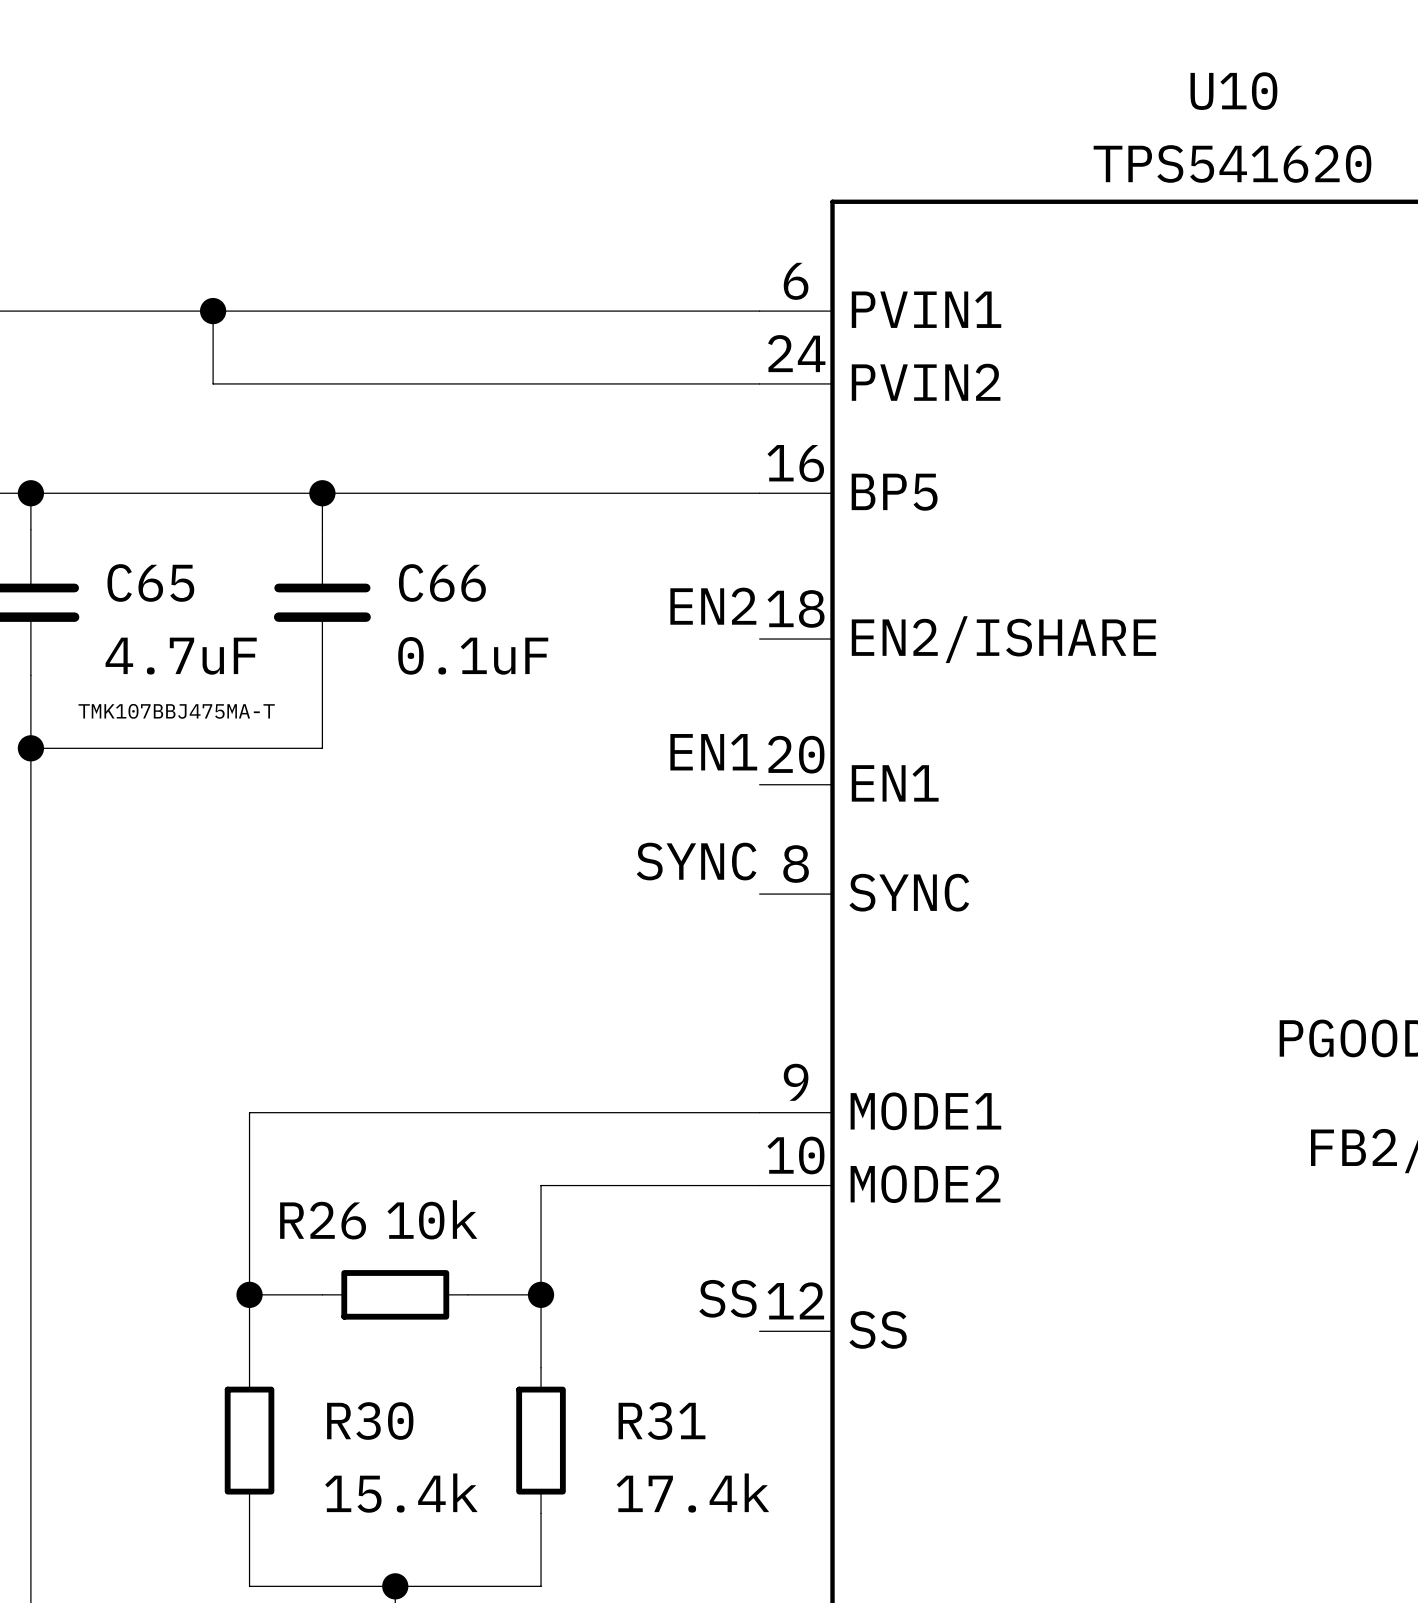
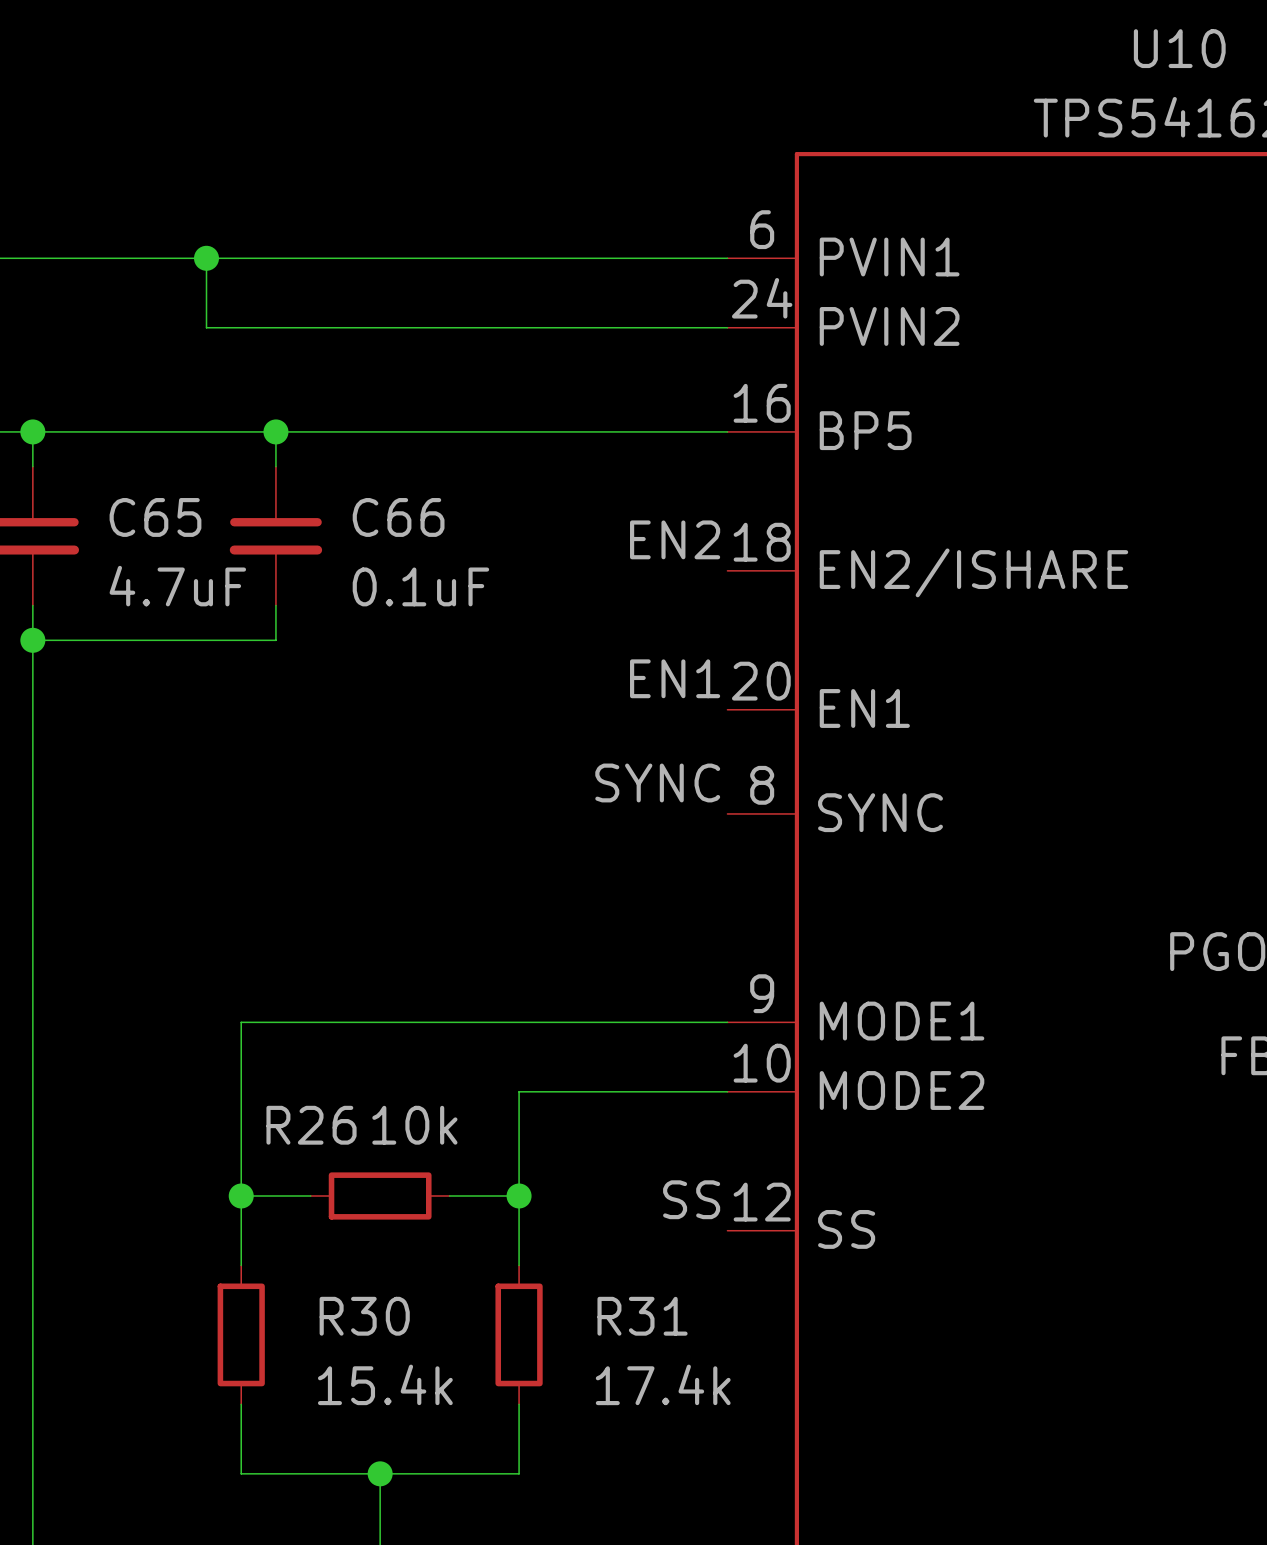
wire: (322, 493) (322, 529) -> (275, 431) (275, 466)
junction position: (322, 493) -> (275, 431)
C66 position: (322, 602) -> (275, 536)
wire: none -> (275, 605) (275, 640) (32, 640)
wire: (322, 675) (322, 748) (30, 748) -> none
C65 text: TMK107BBJ475MA-T (176, 711) -> none
junction position: (30, 748) -> (32, 640)

